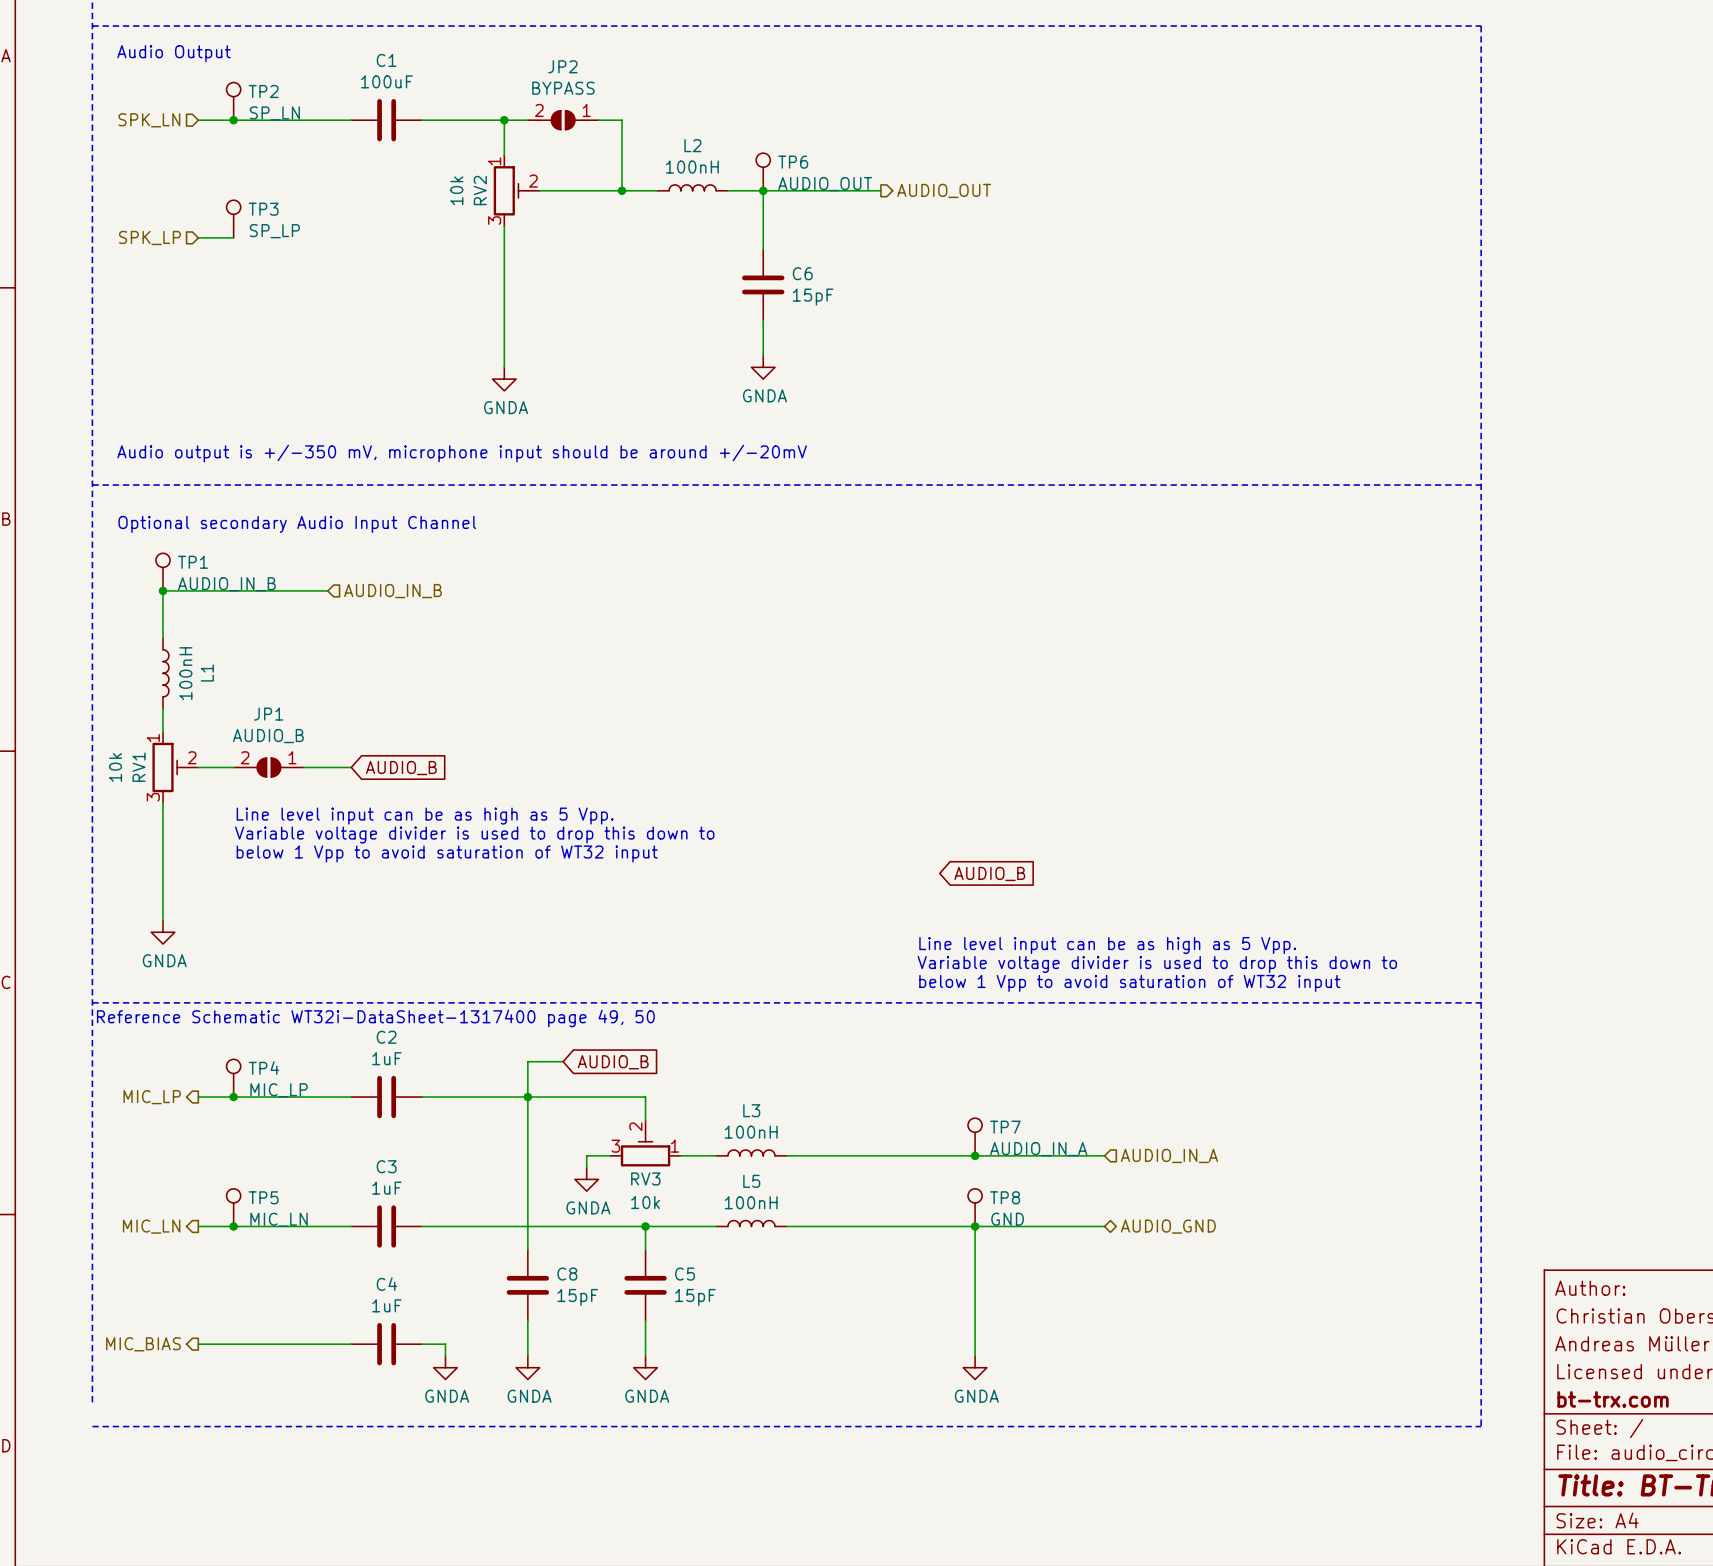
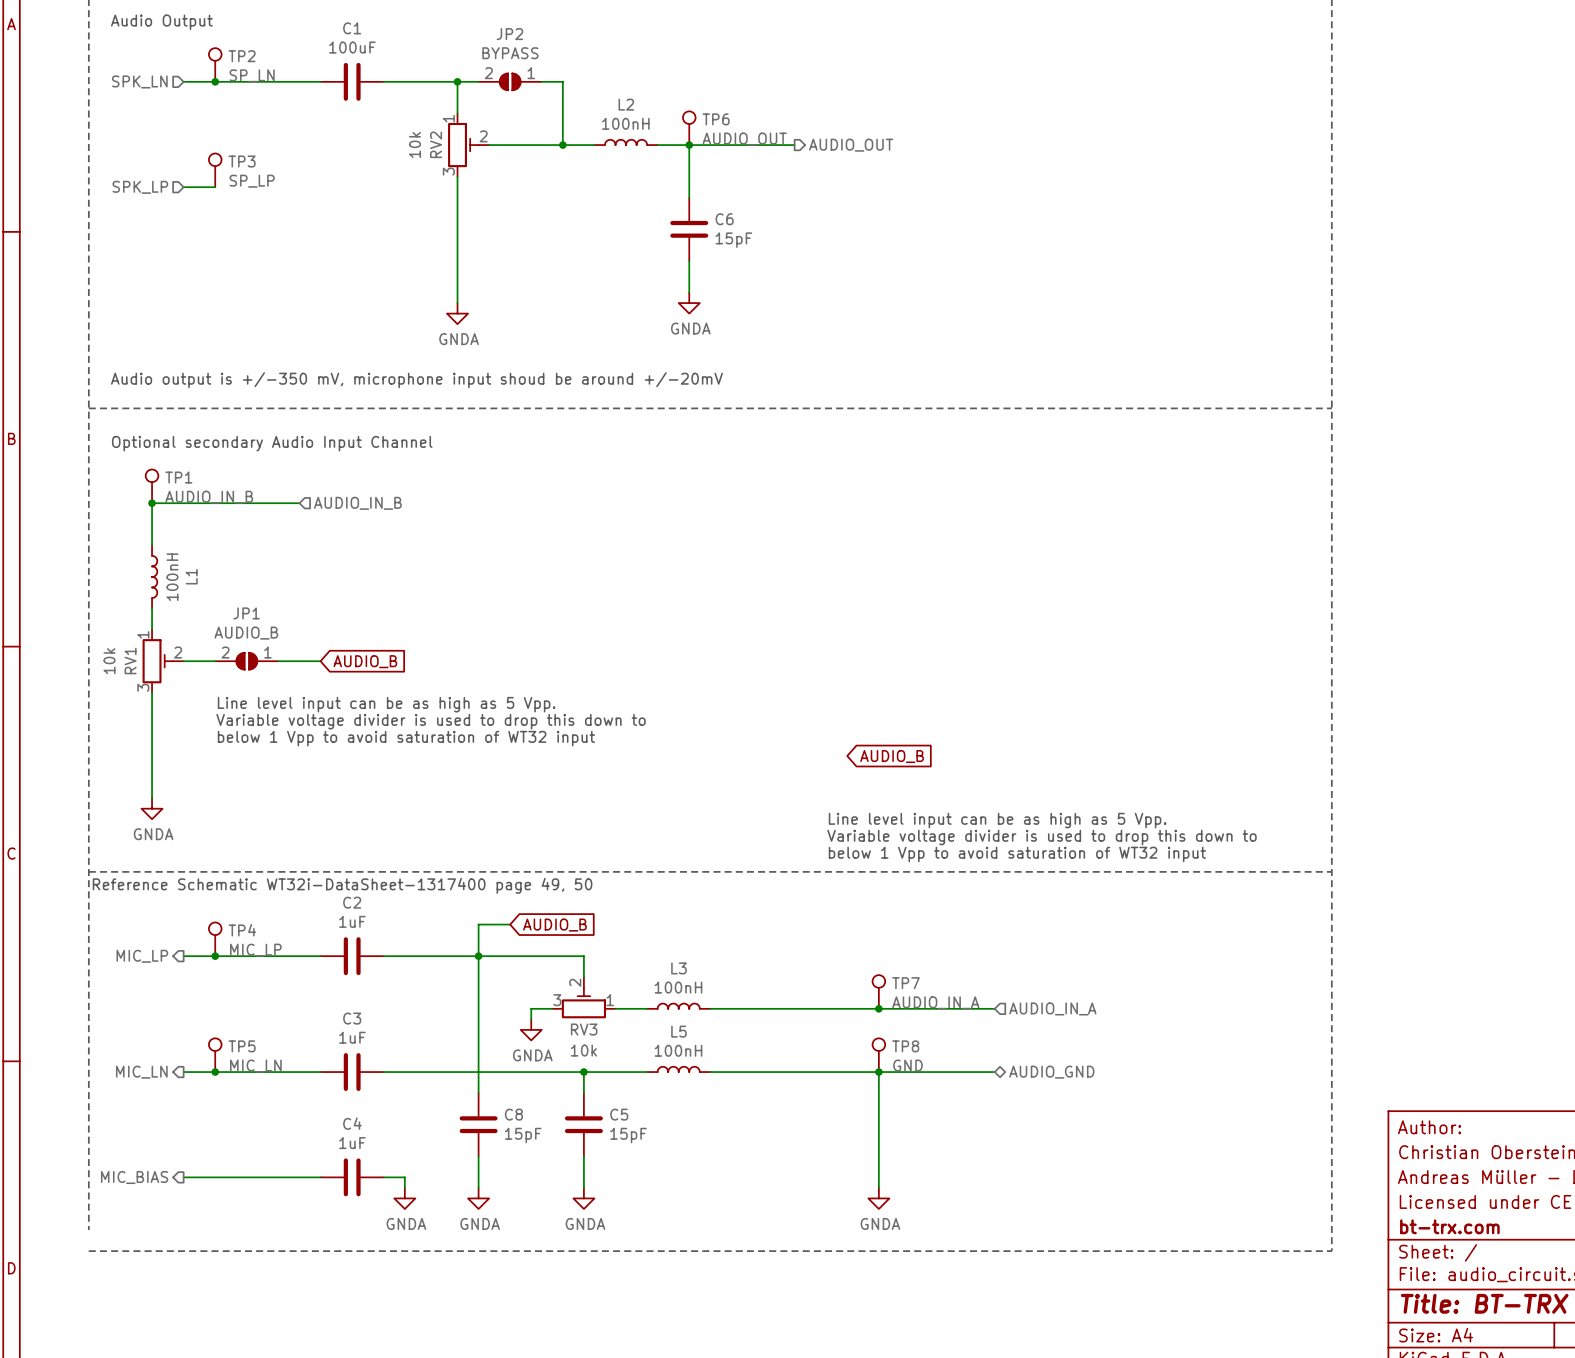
text: Audio output is +/-350 mV, microphone input should be around +/-20mV (462, 453) -> Audio output is +/-350 mV, microphone input shoud be around +/-20mV (416, 380)

